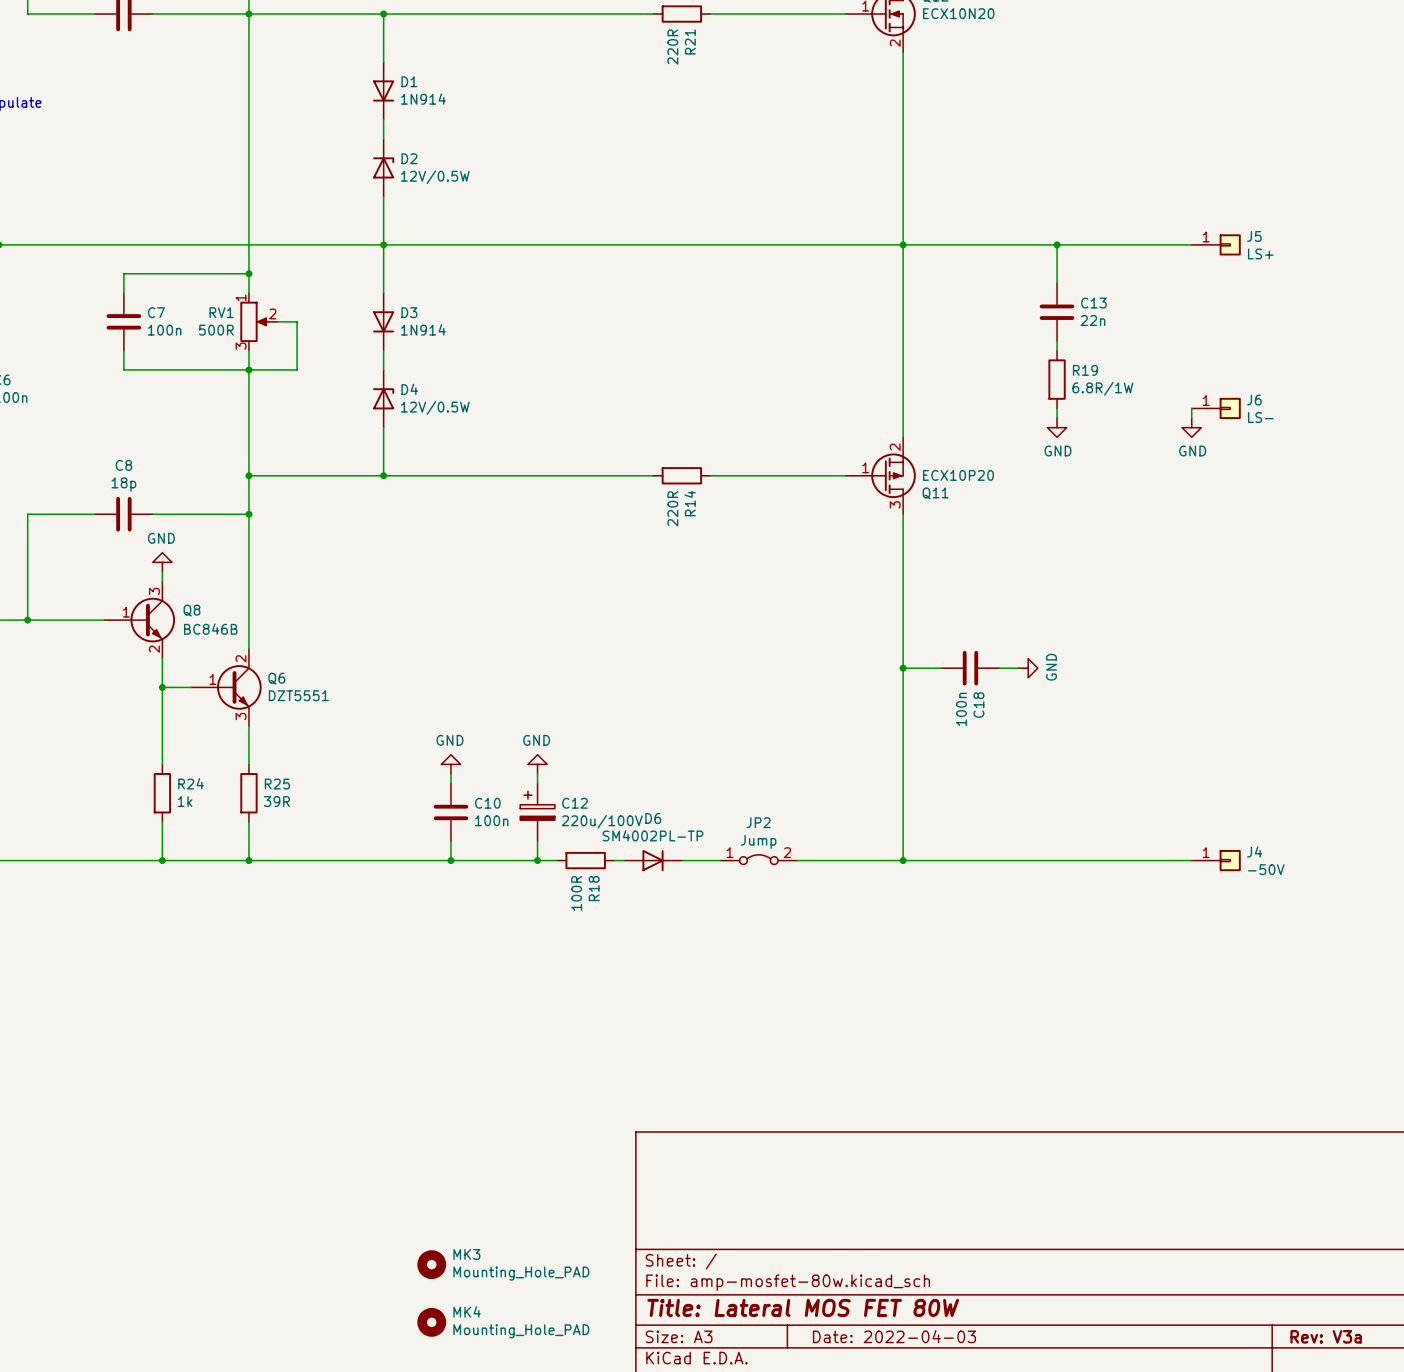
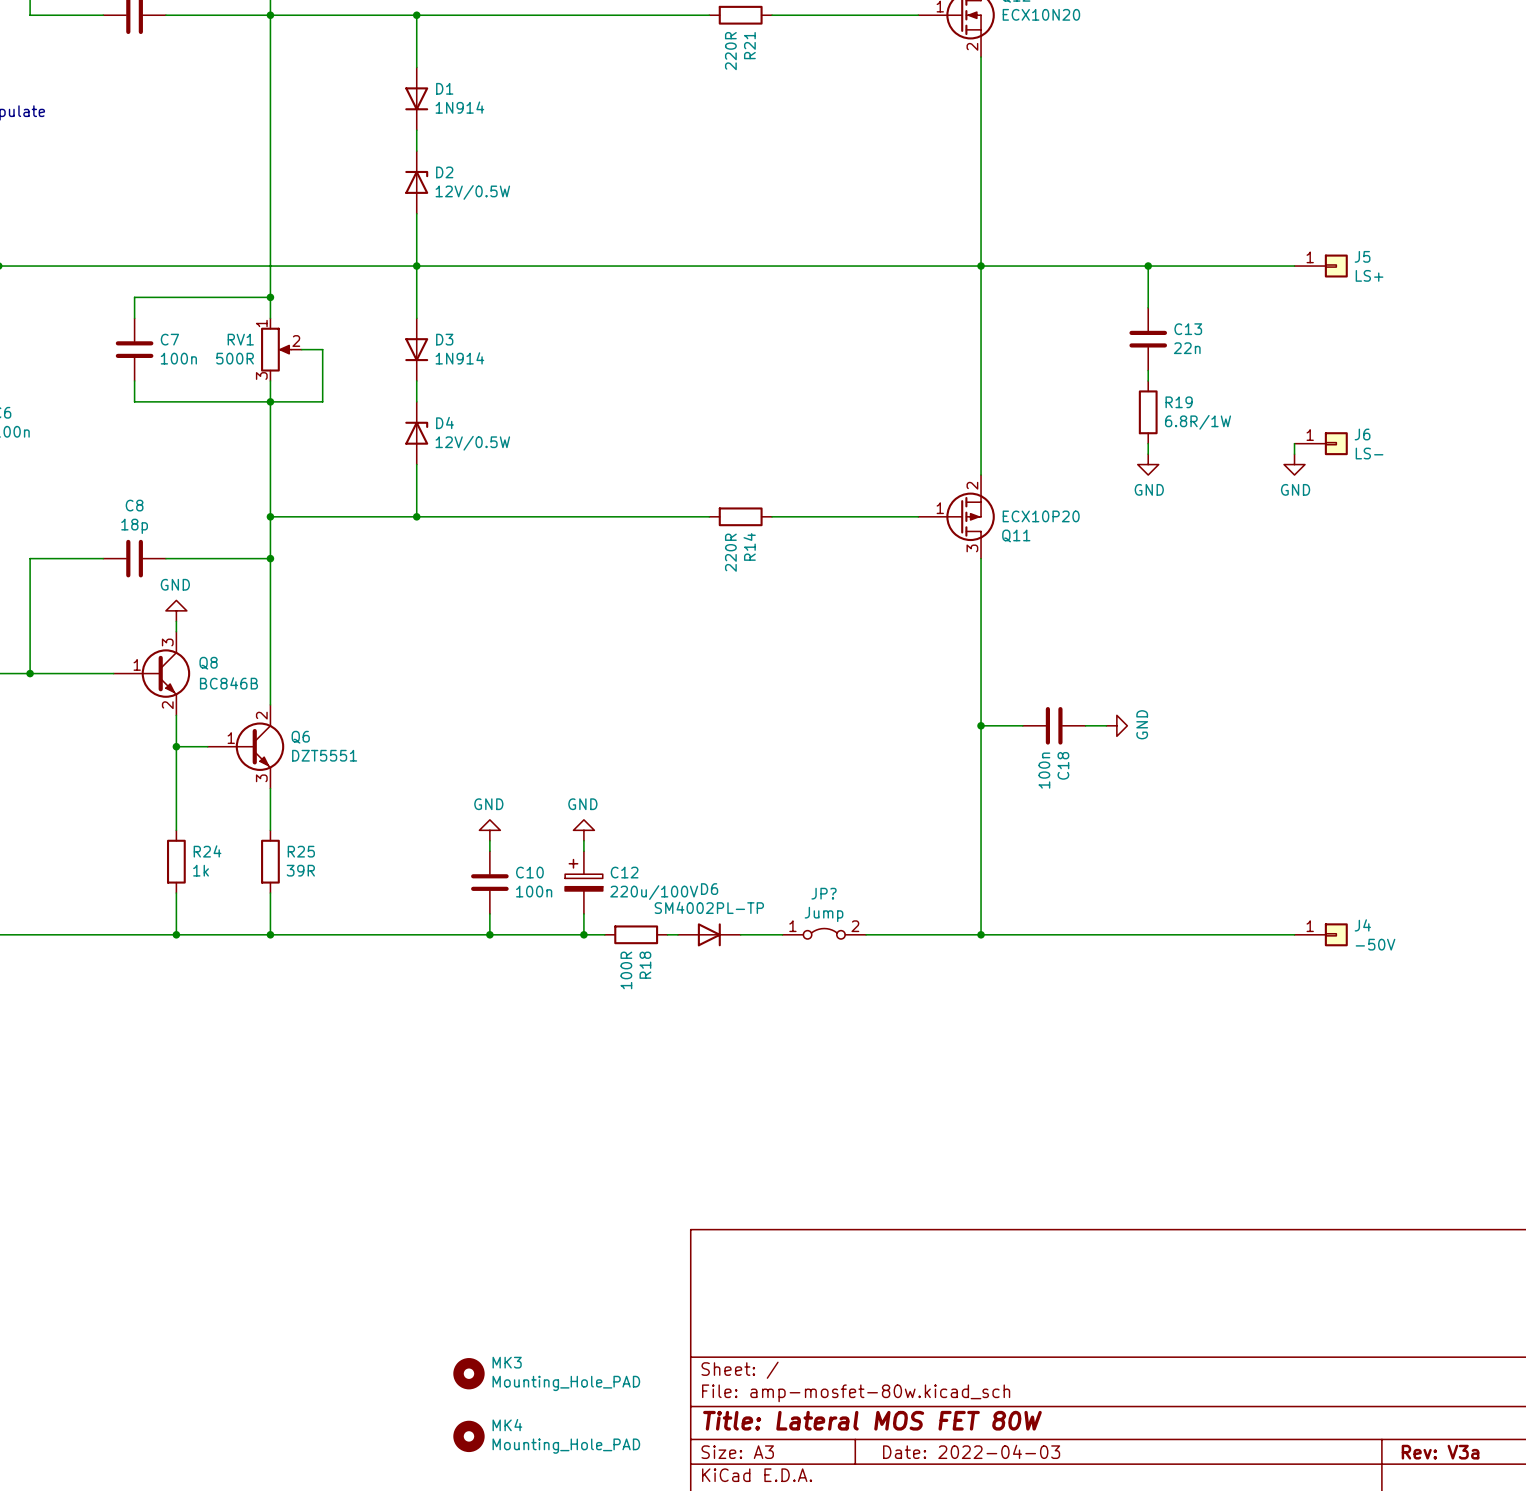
JP2 name: JP2 (758, 822) -> JP? (824, 893)

